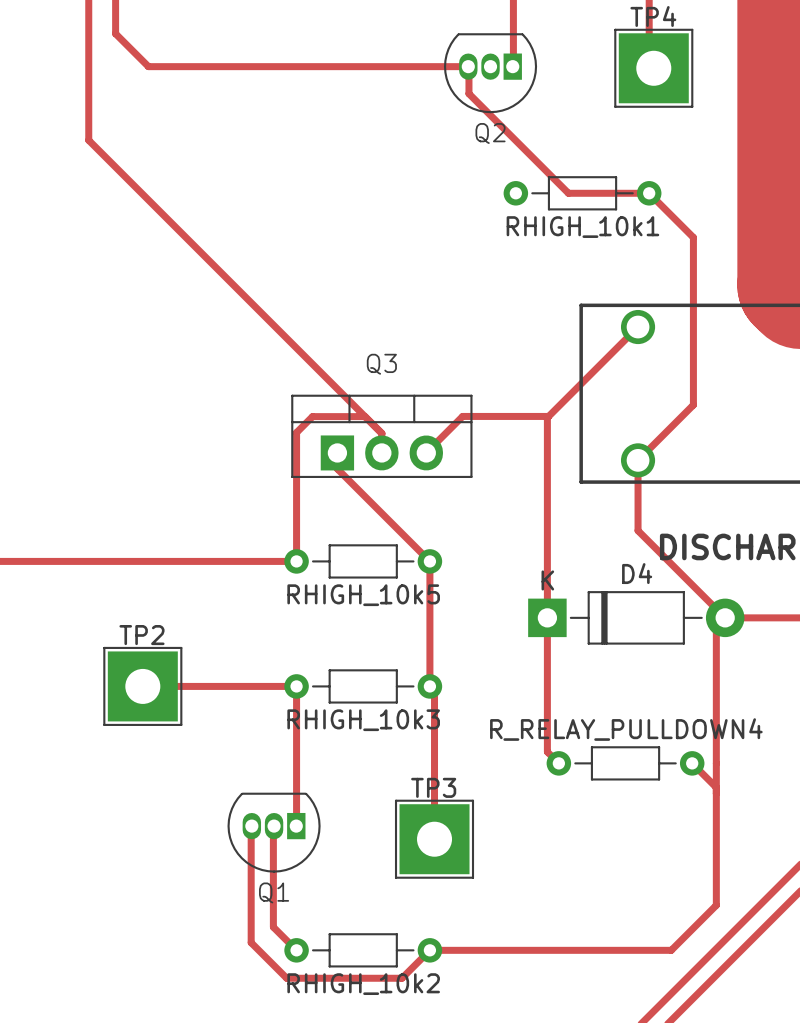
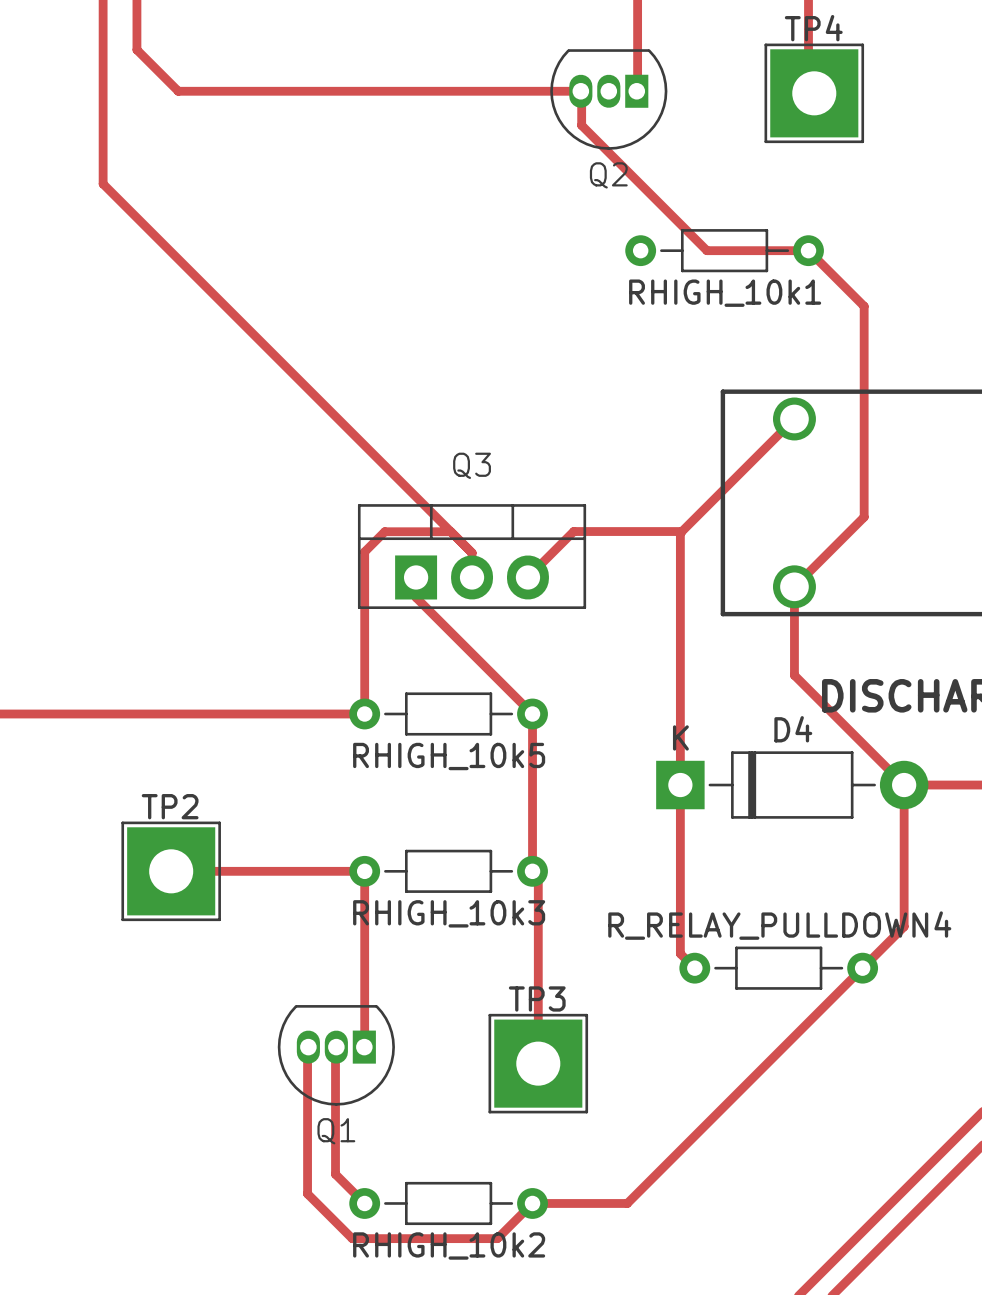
track: (716, 626) (716, 905) (671, 950) (505, 950) -> (904, 785) (904, 926) (627, 1203)
track: (692, 763) (716, 787) -> none

